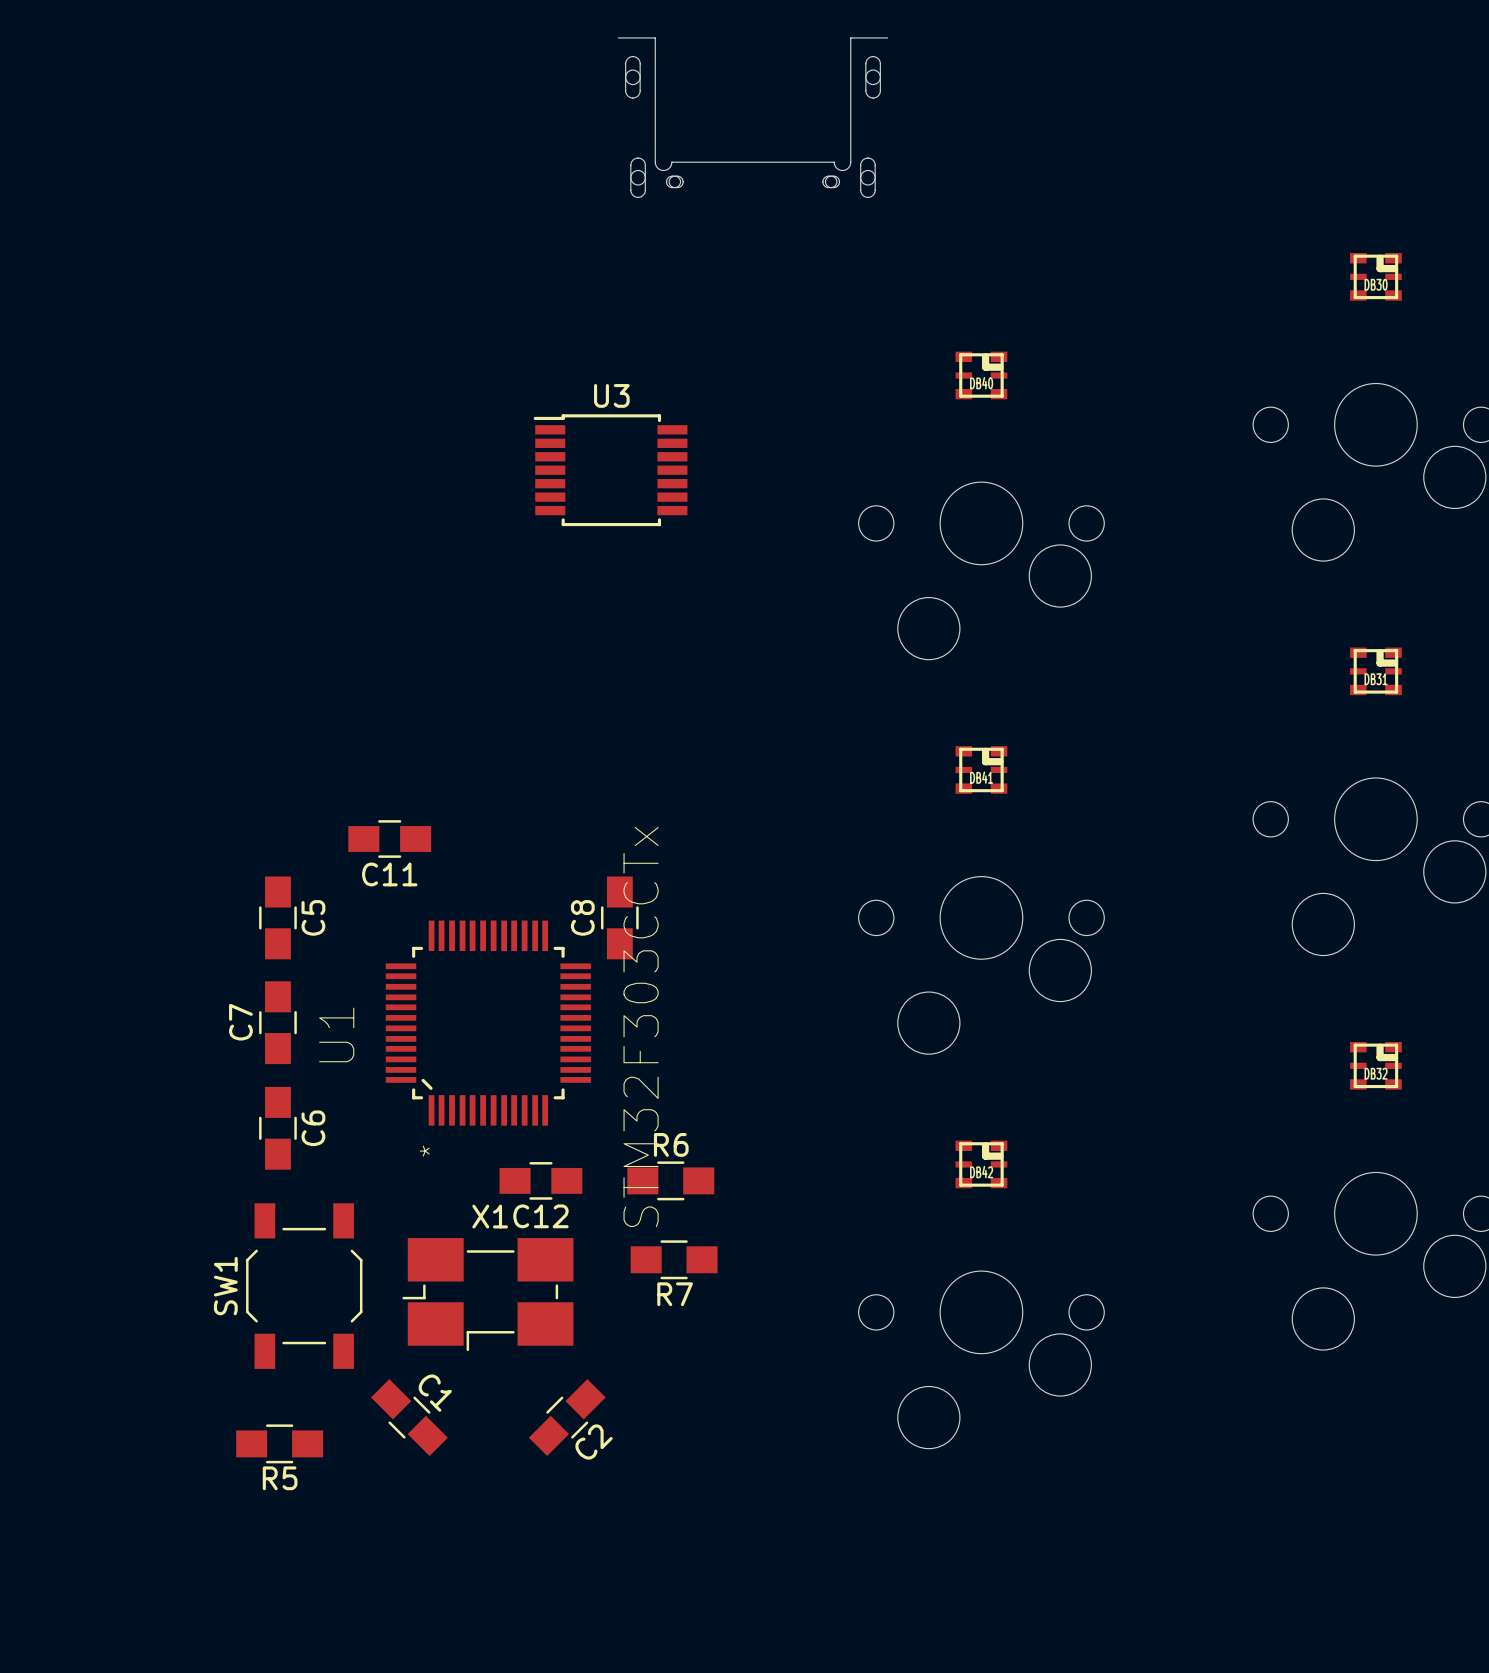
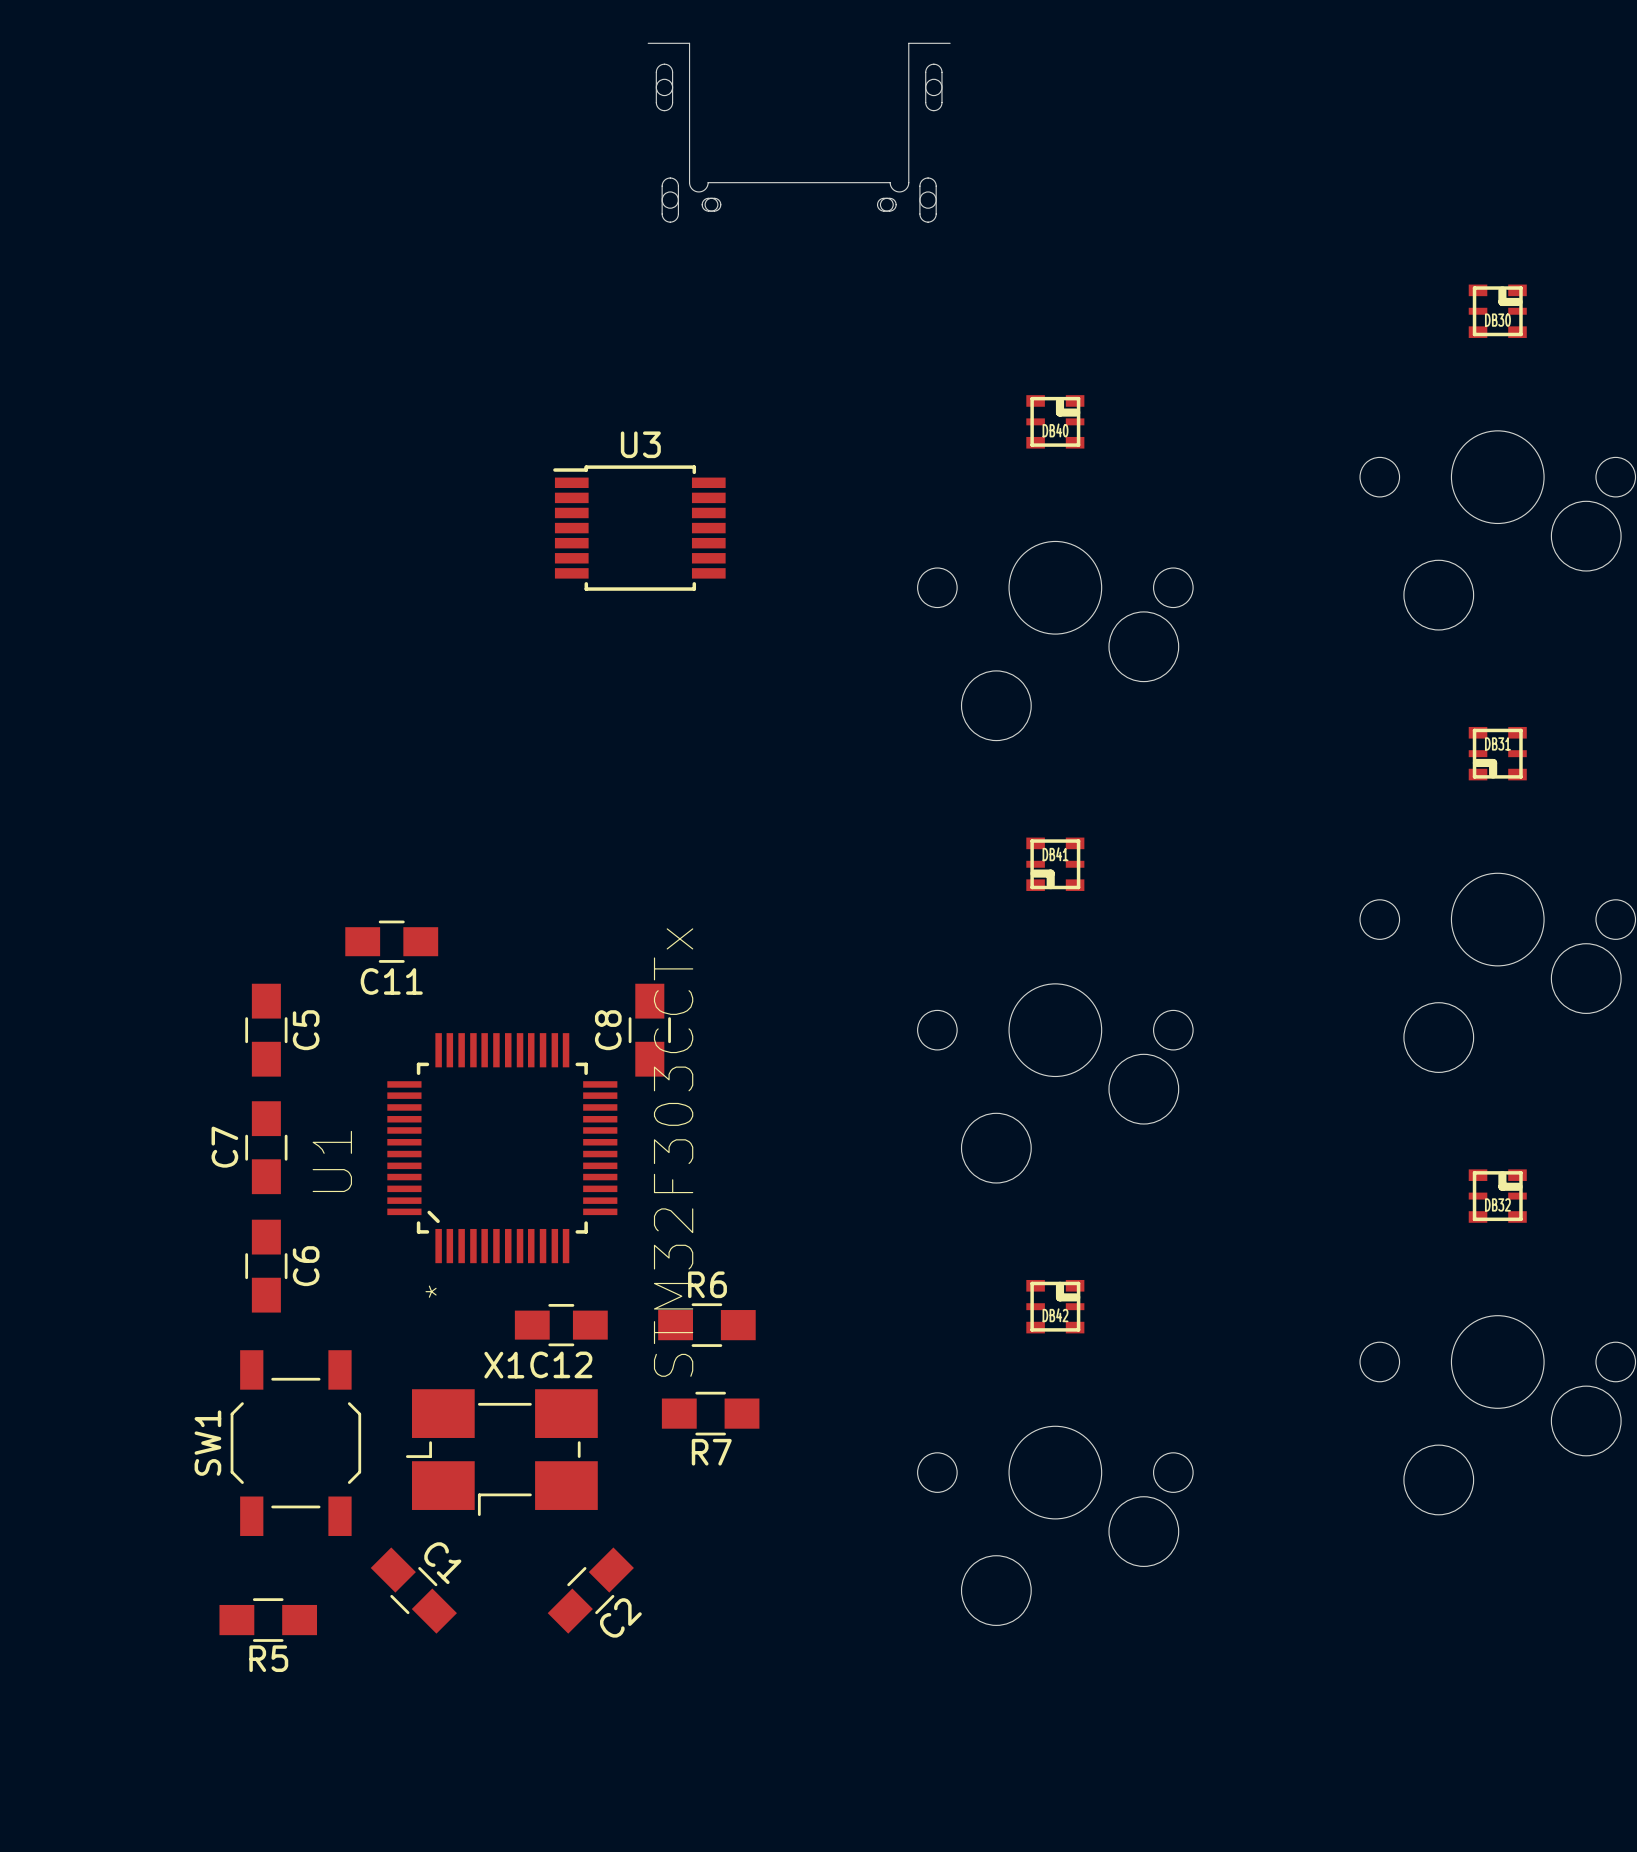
DB31 rotation: 0° (1375, 671) -> 180° (1497, 753)
DB41 rotation: 0° (981, 769) -> 180° (1055, 864)

